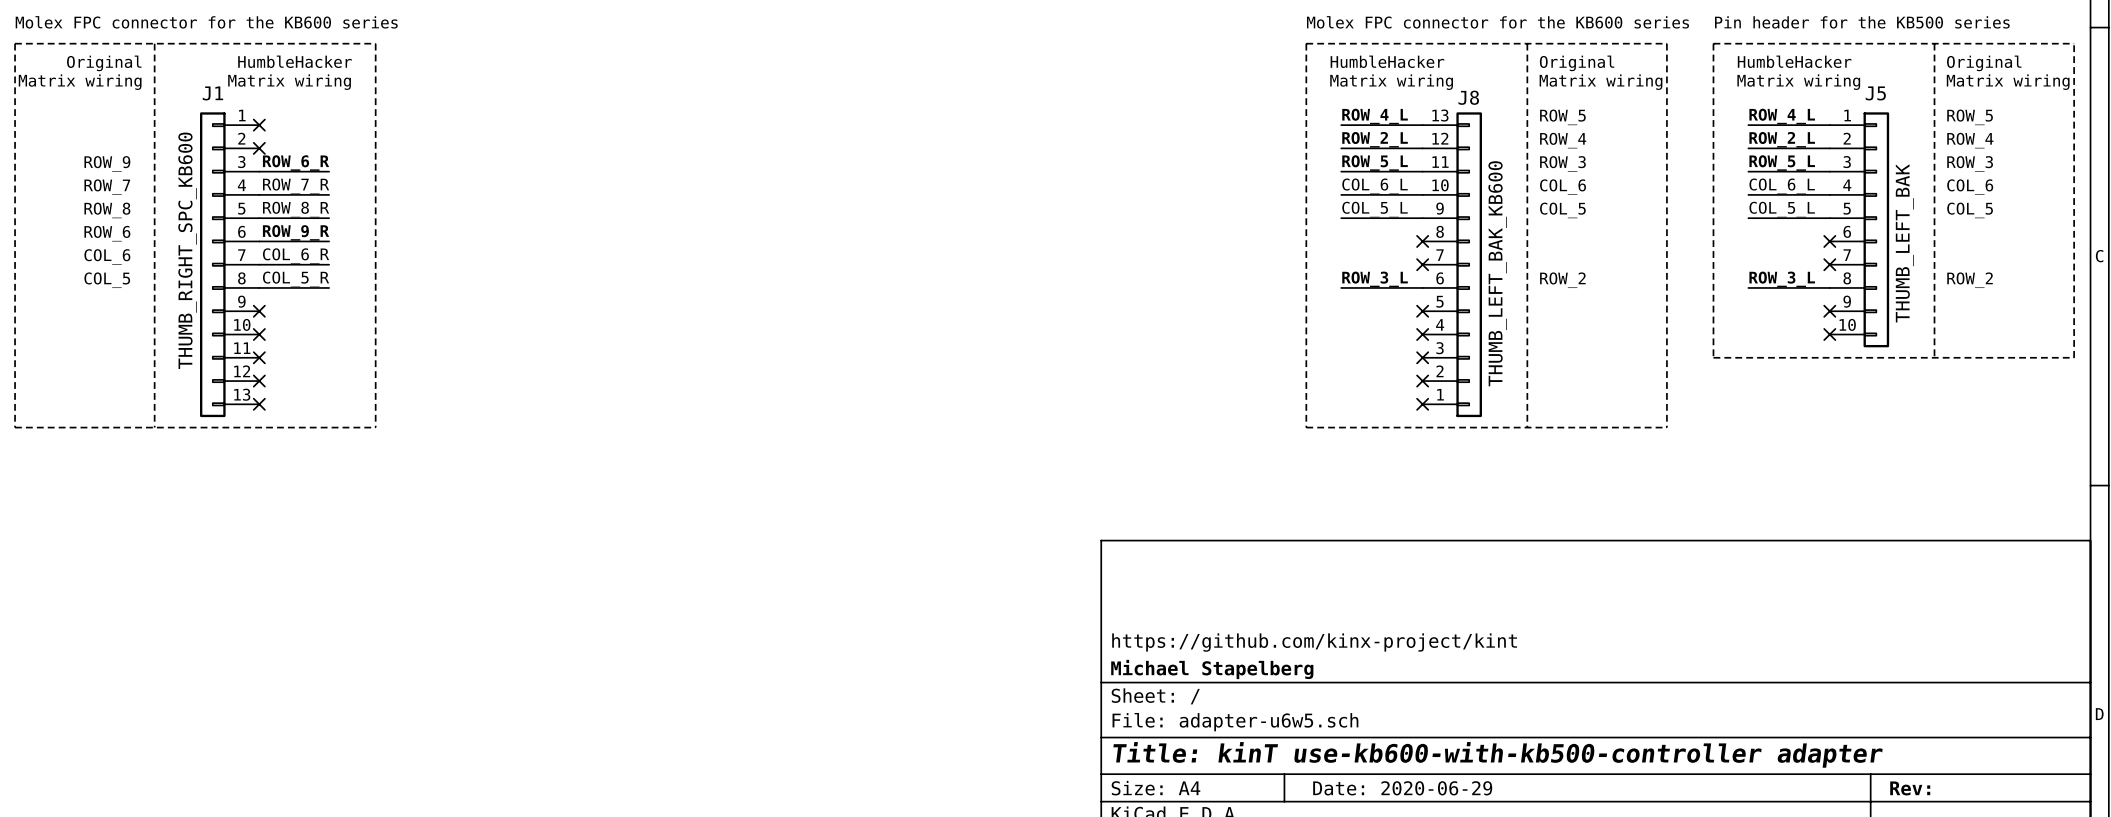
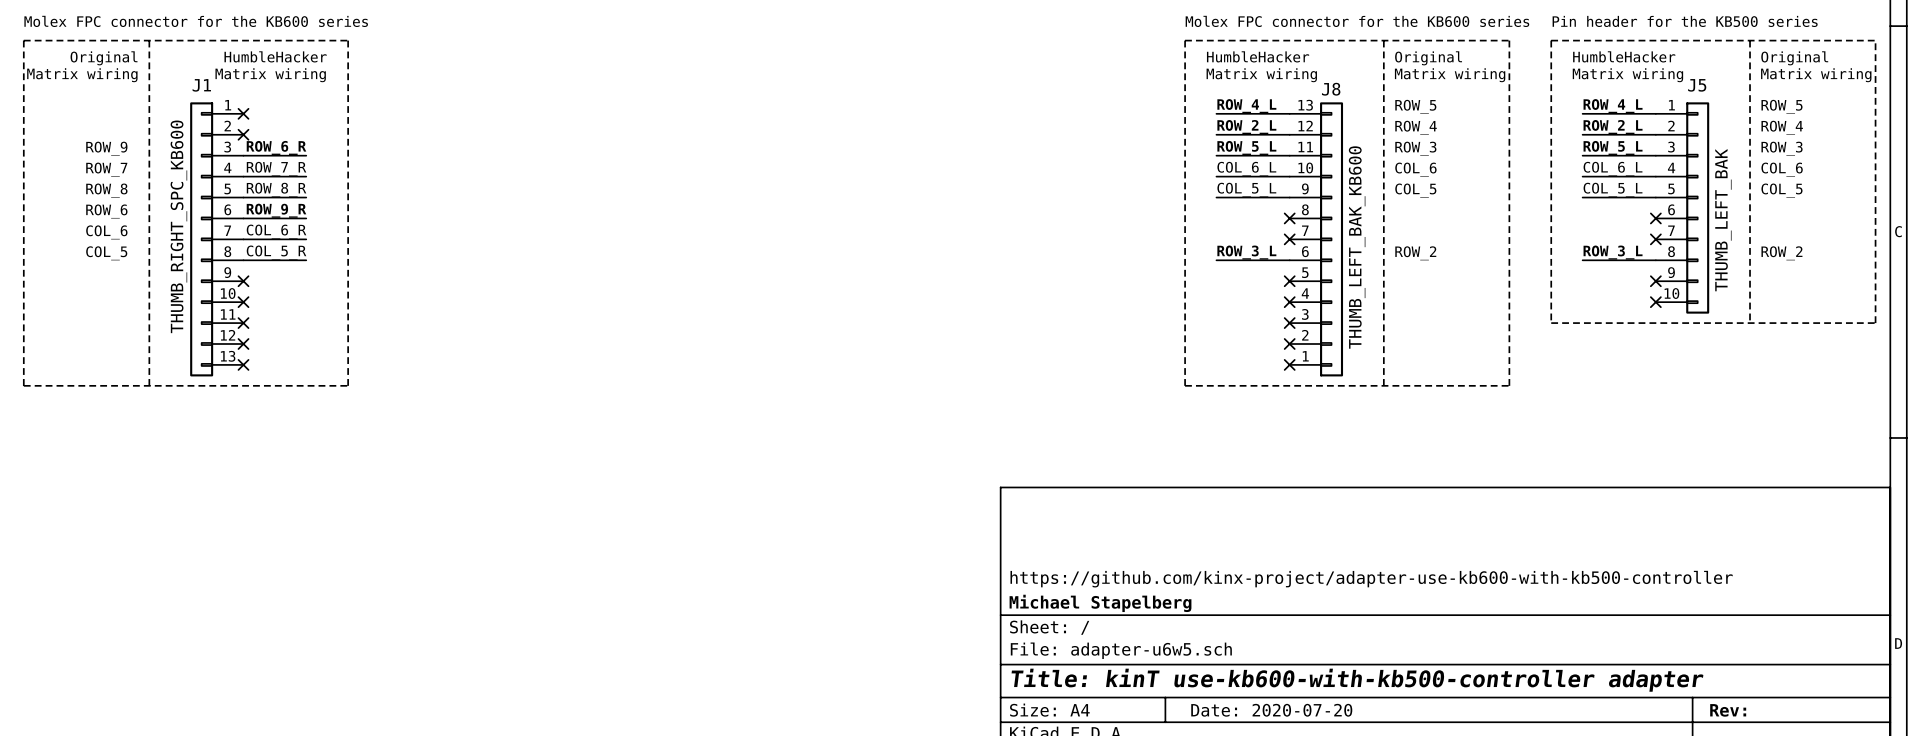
title block: https://github.com/kinx-project/kint (1314, 642) -> https://github.com/kinx-project/adapter-use-kb600-with-kb500-controller (1371, 579)
title block: Date: 2020-06-29 (1402, 788) -> Date: 2020-07-20 (1271, 710)

